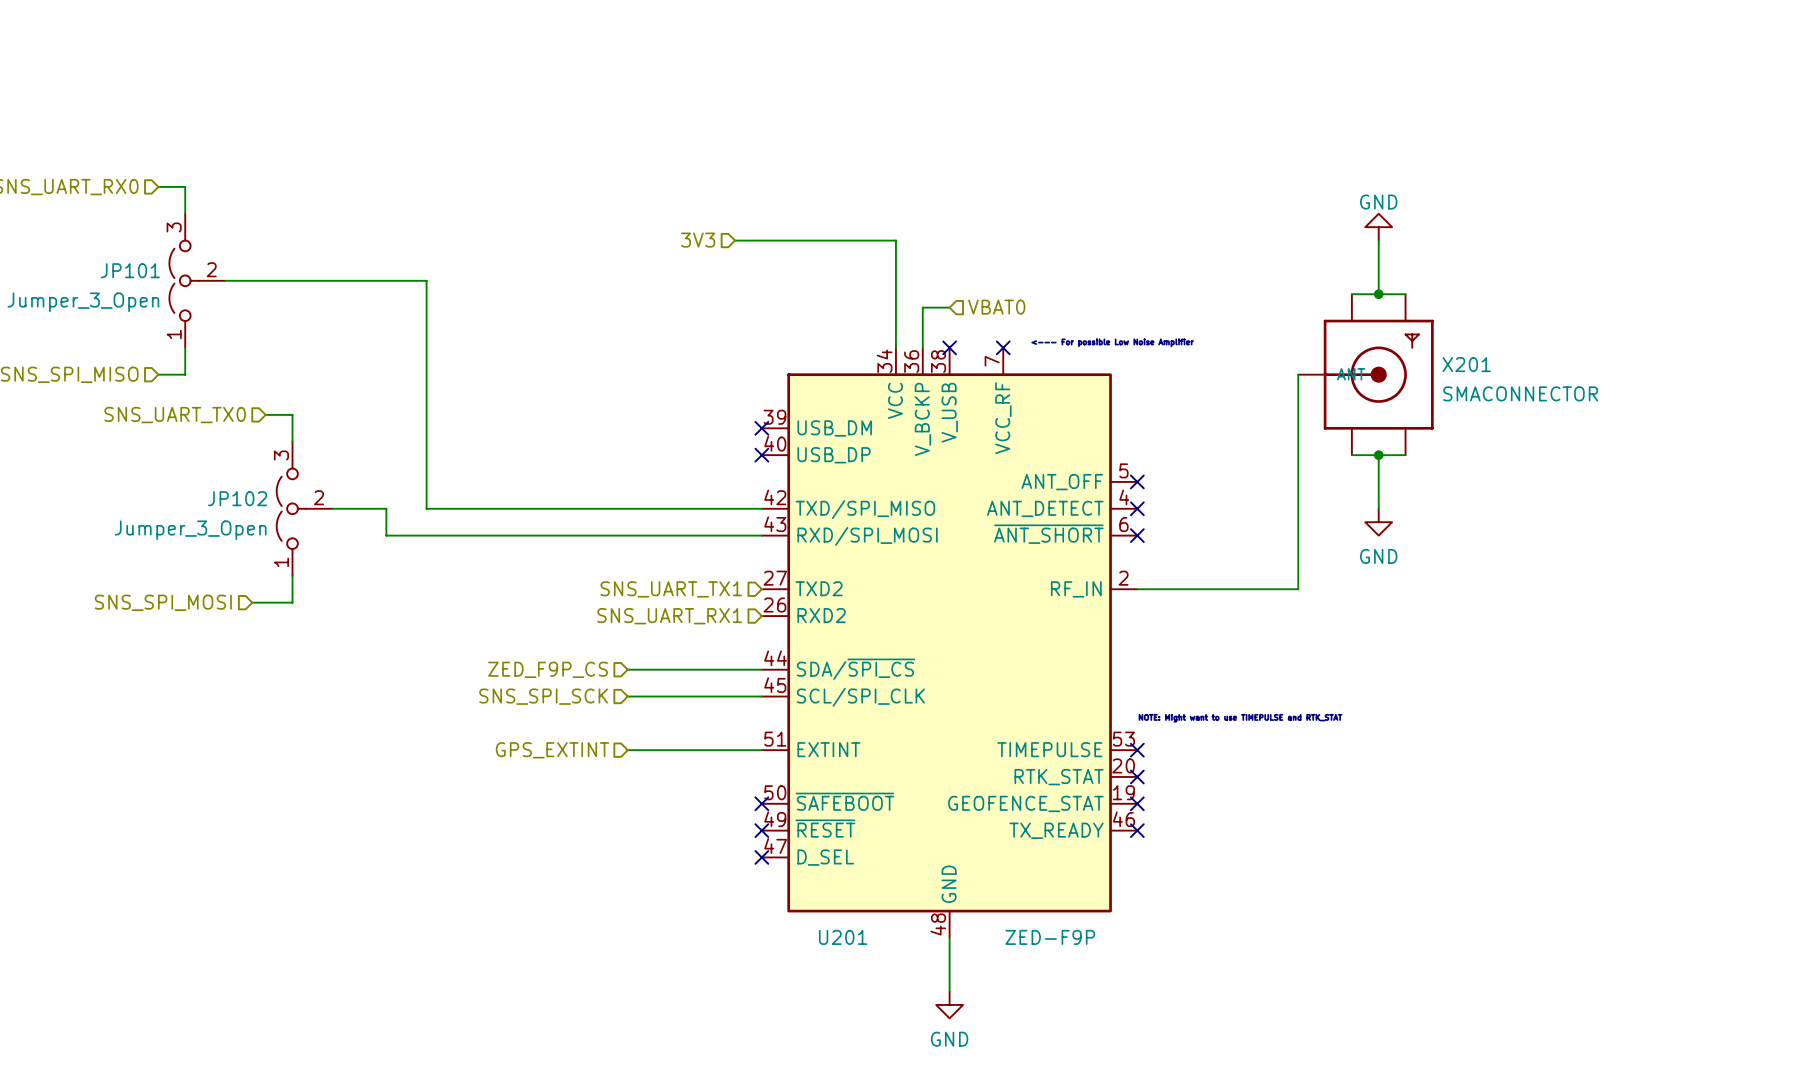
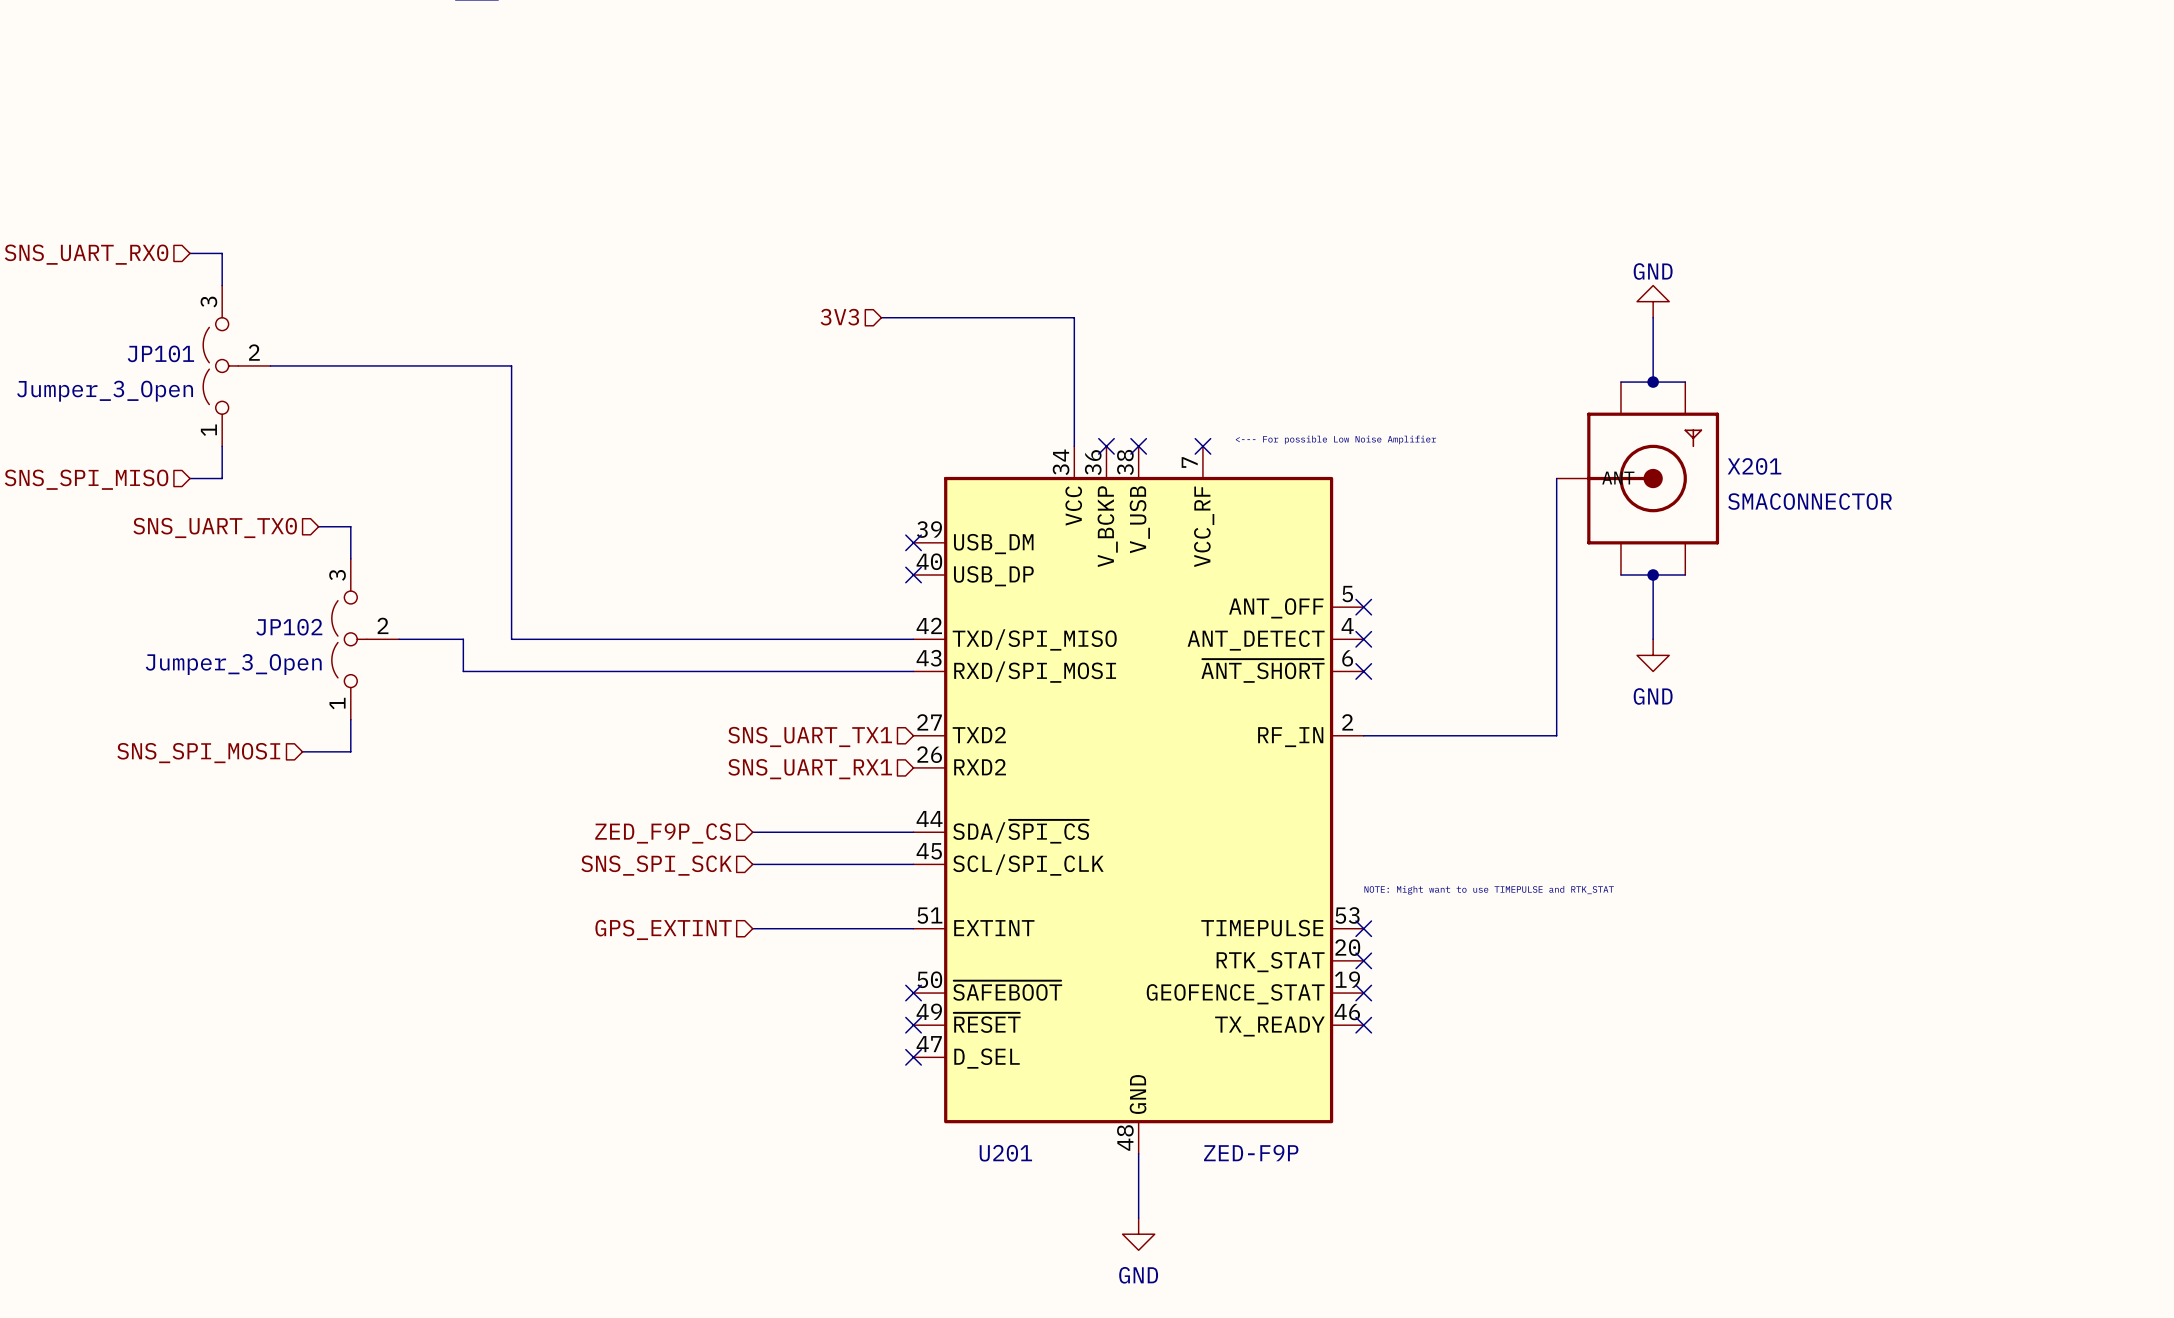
wire: (949, 307) (922, 307) (922, 347) -> none
hierarchical label: VBAT0 (996, 307) -> none
no-connect mark: none -> (1106, 446)

